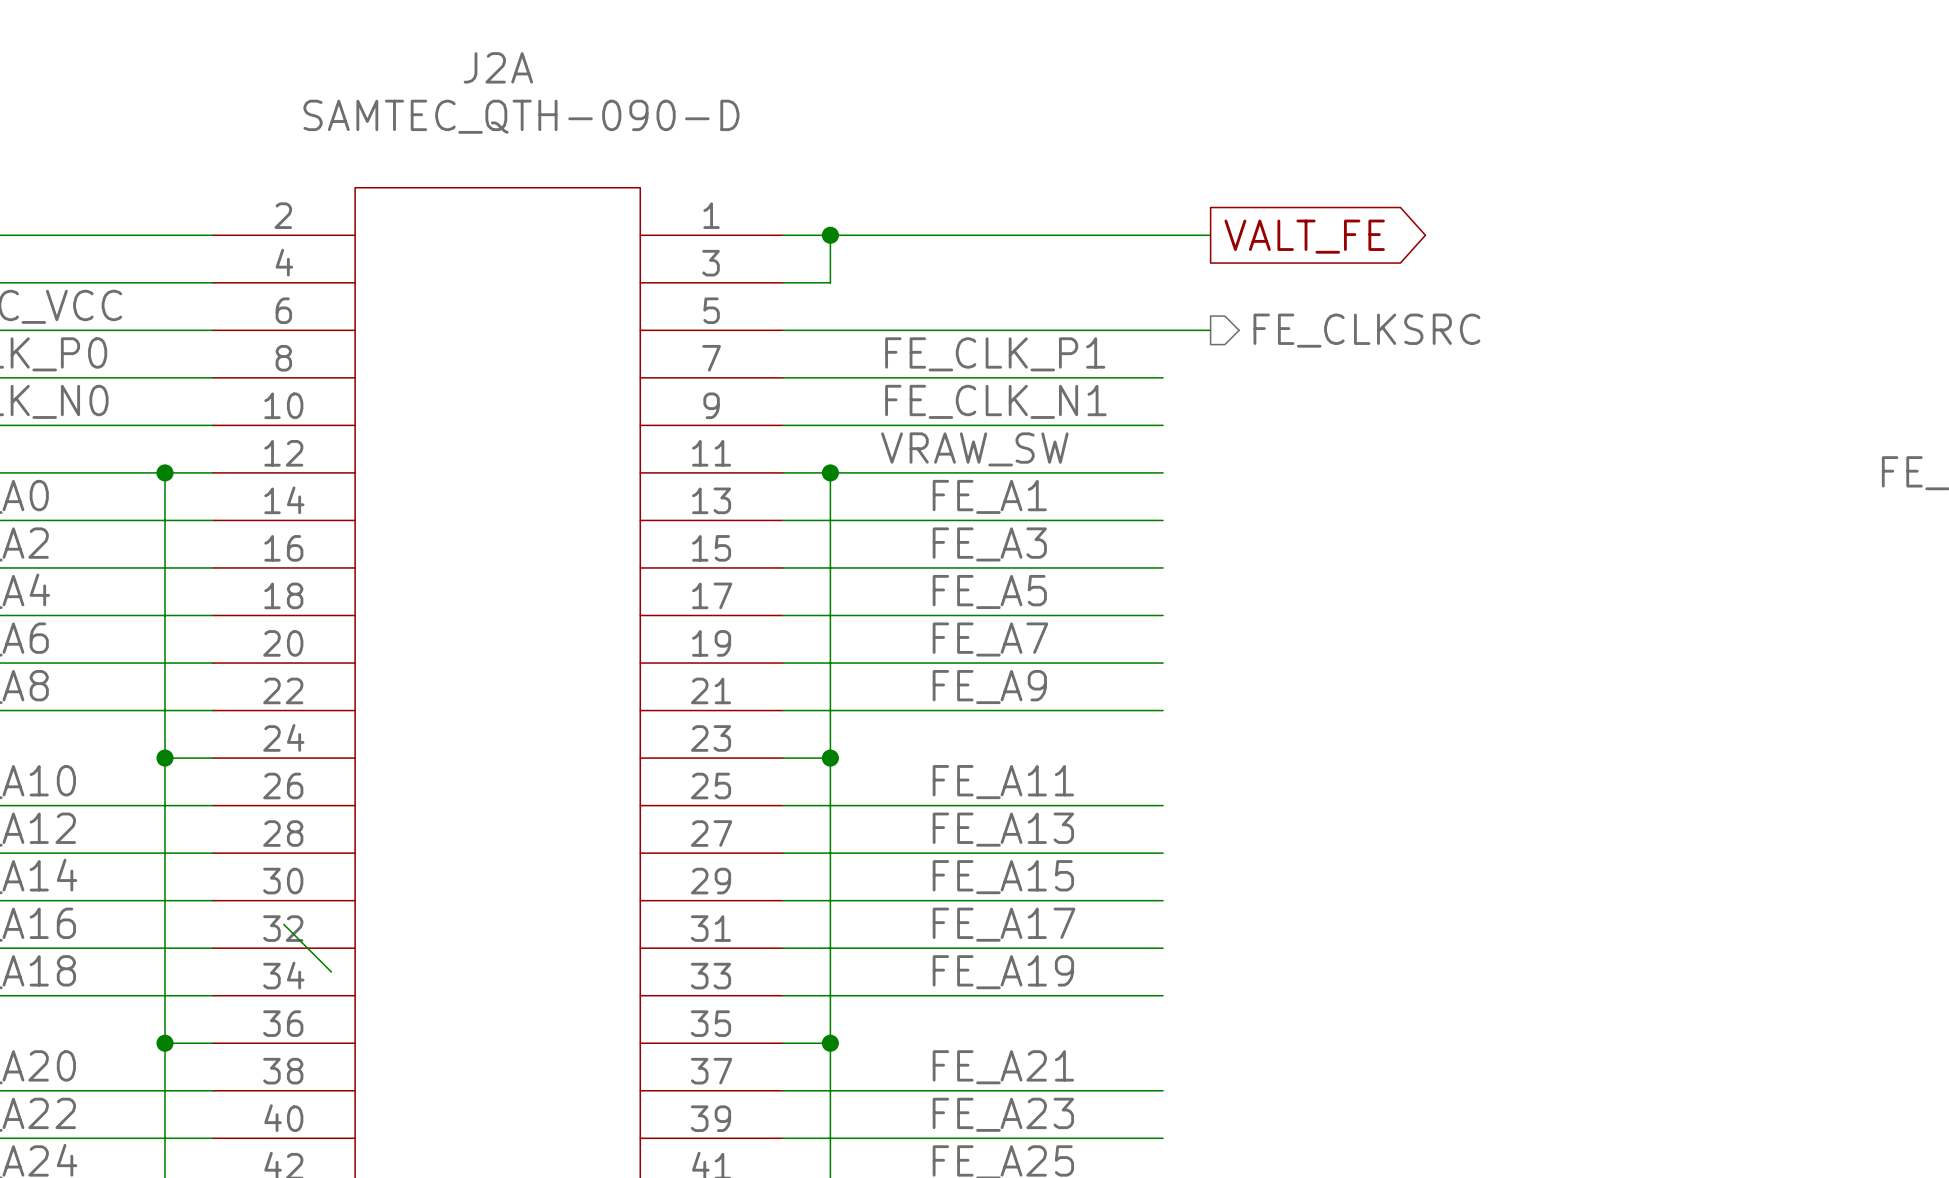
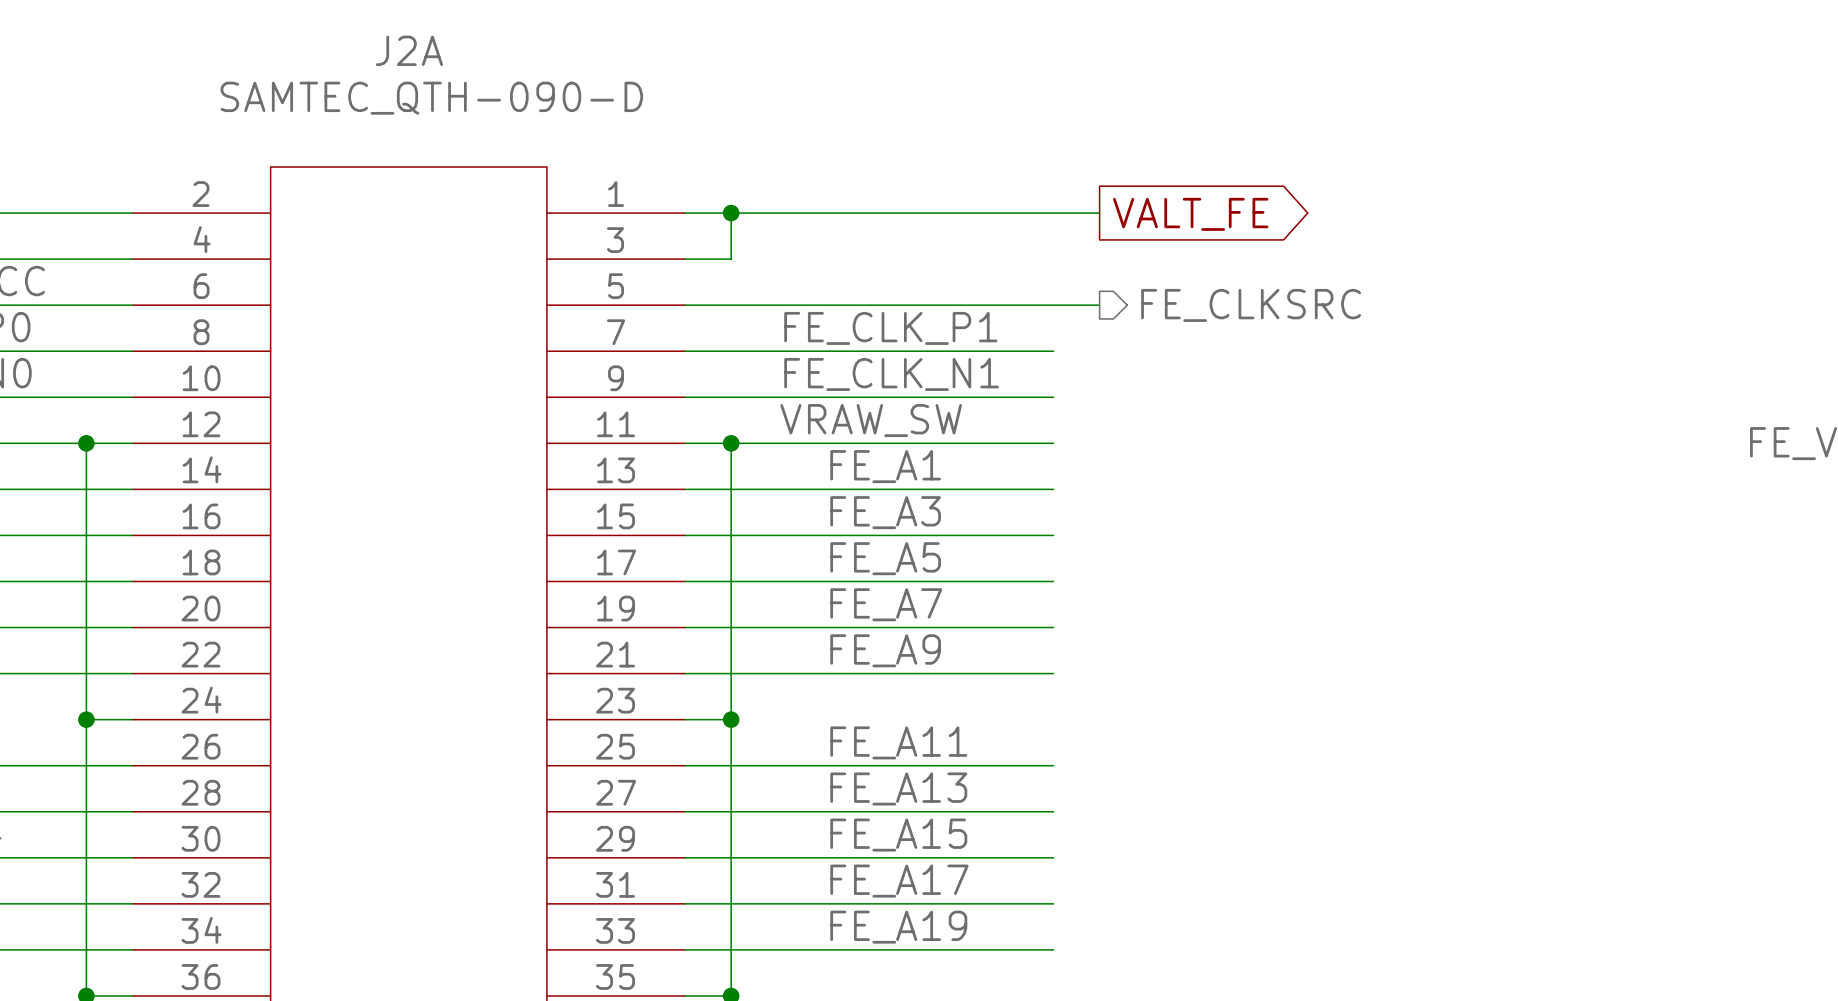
wire: (283, 924) (331, 971) -> none

